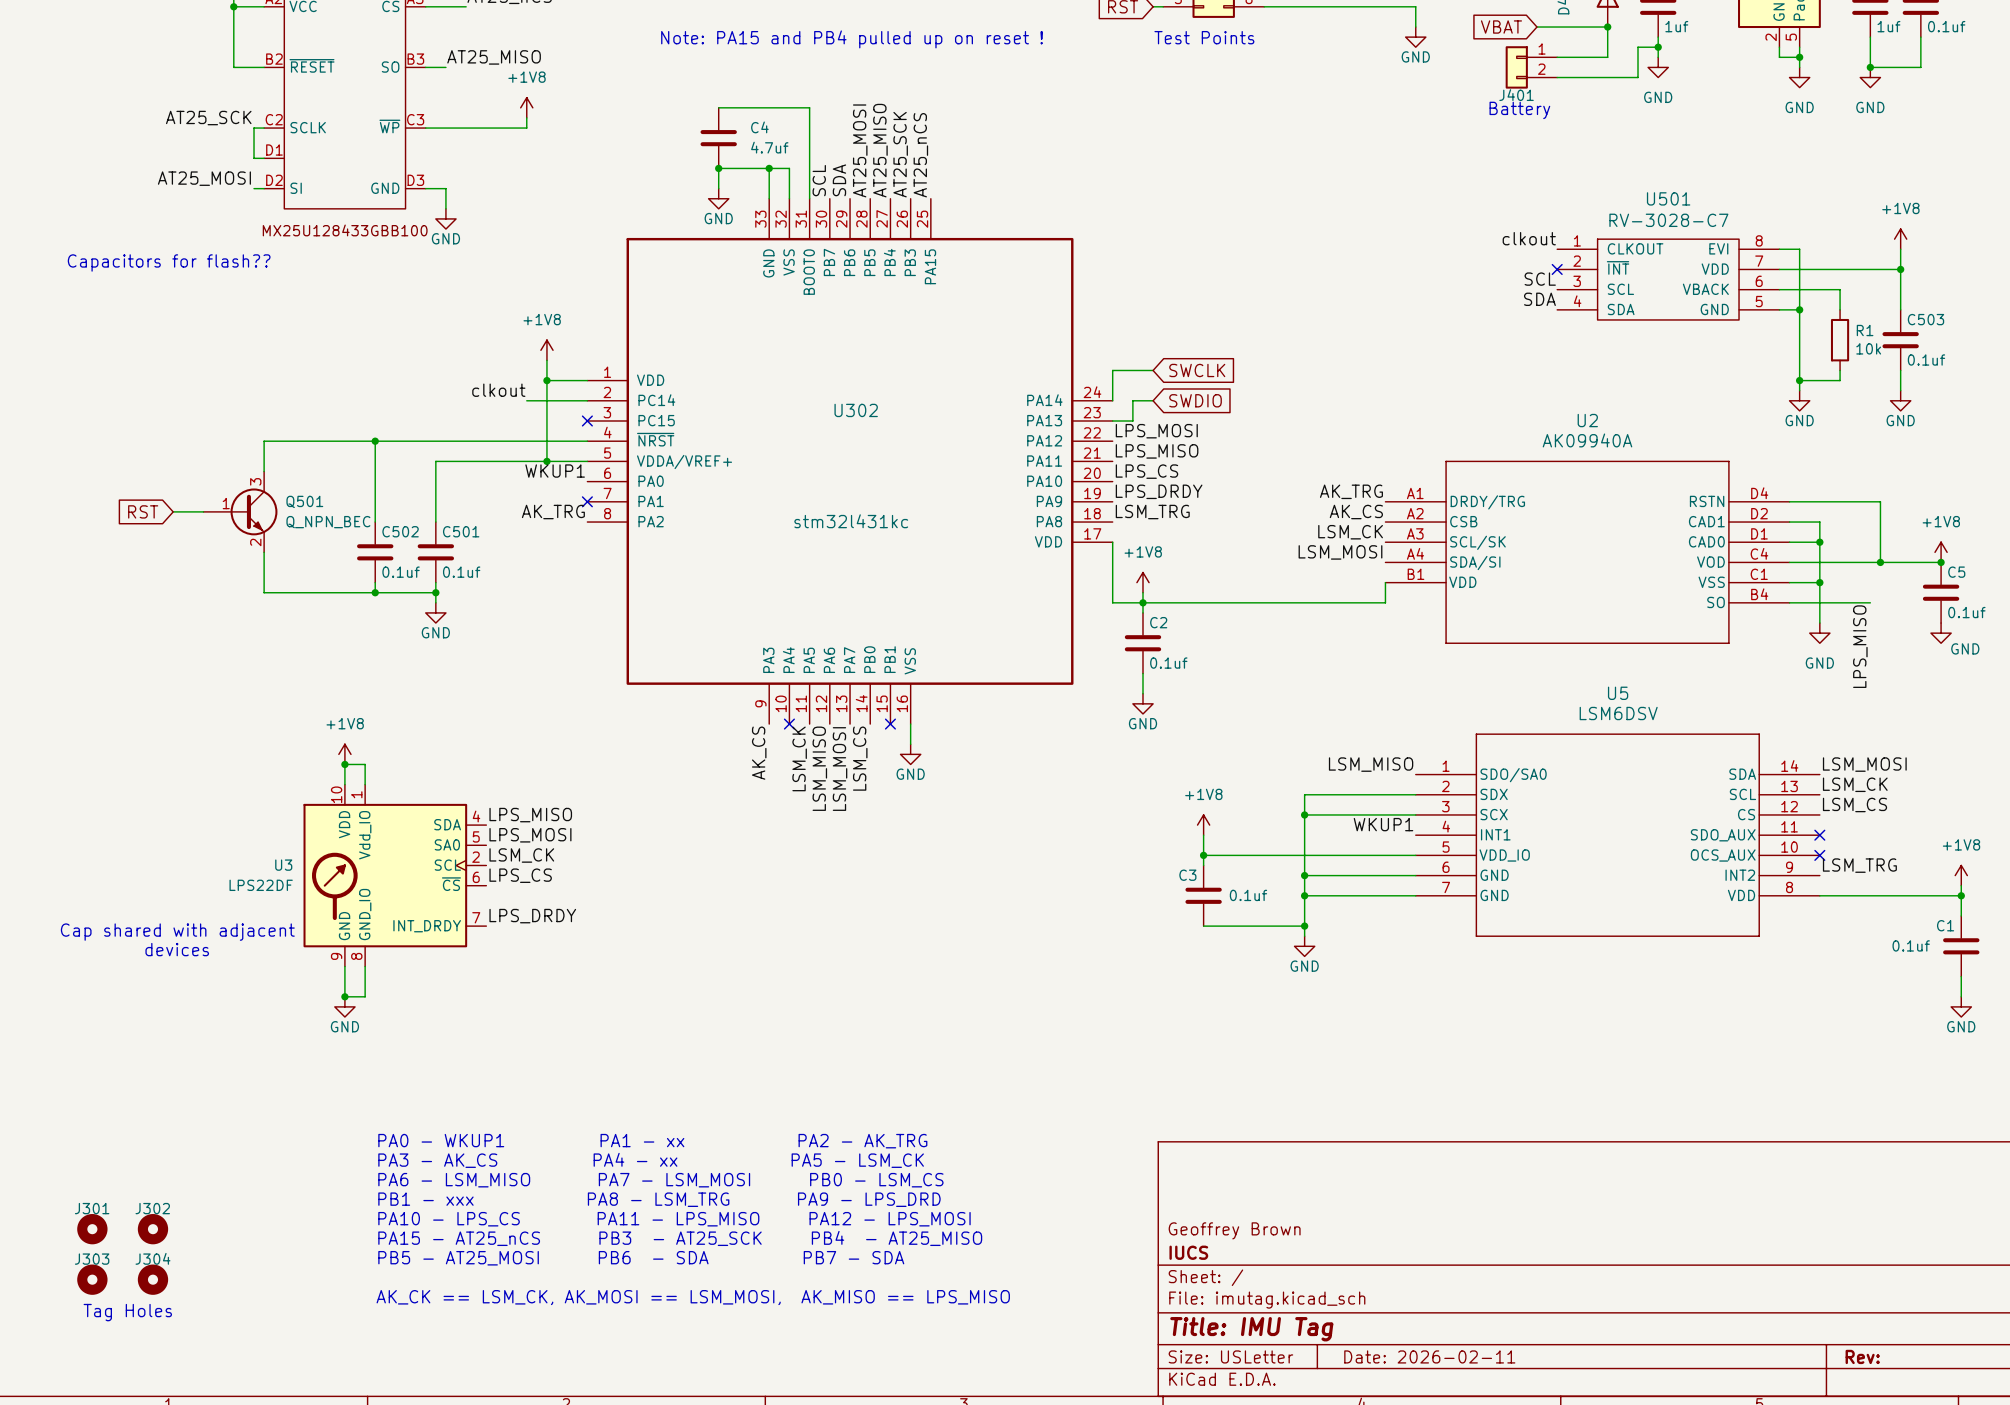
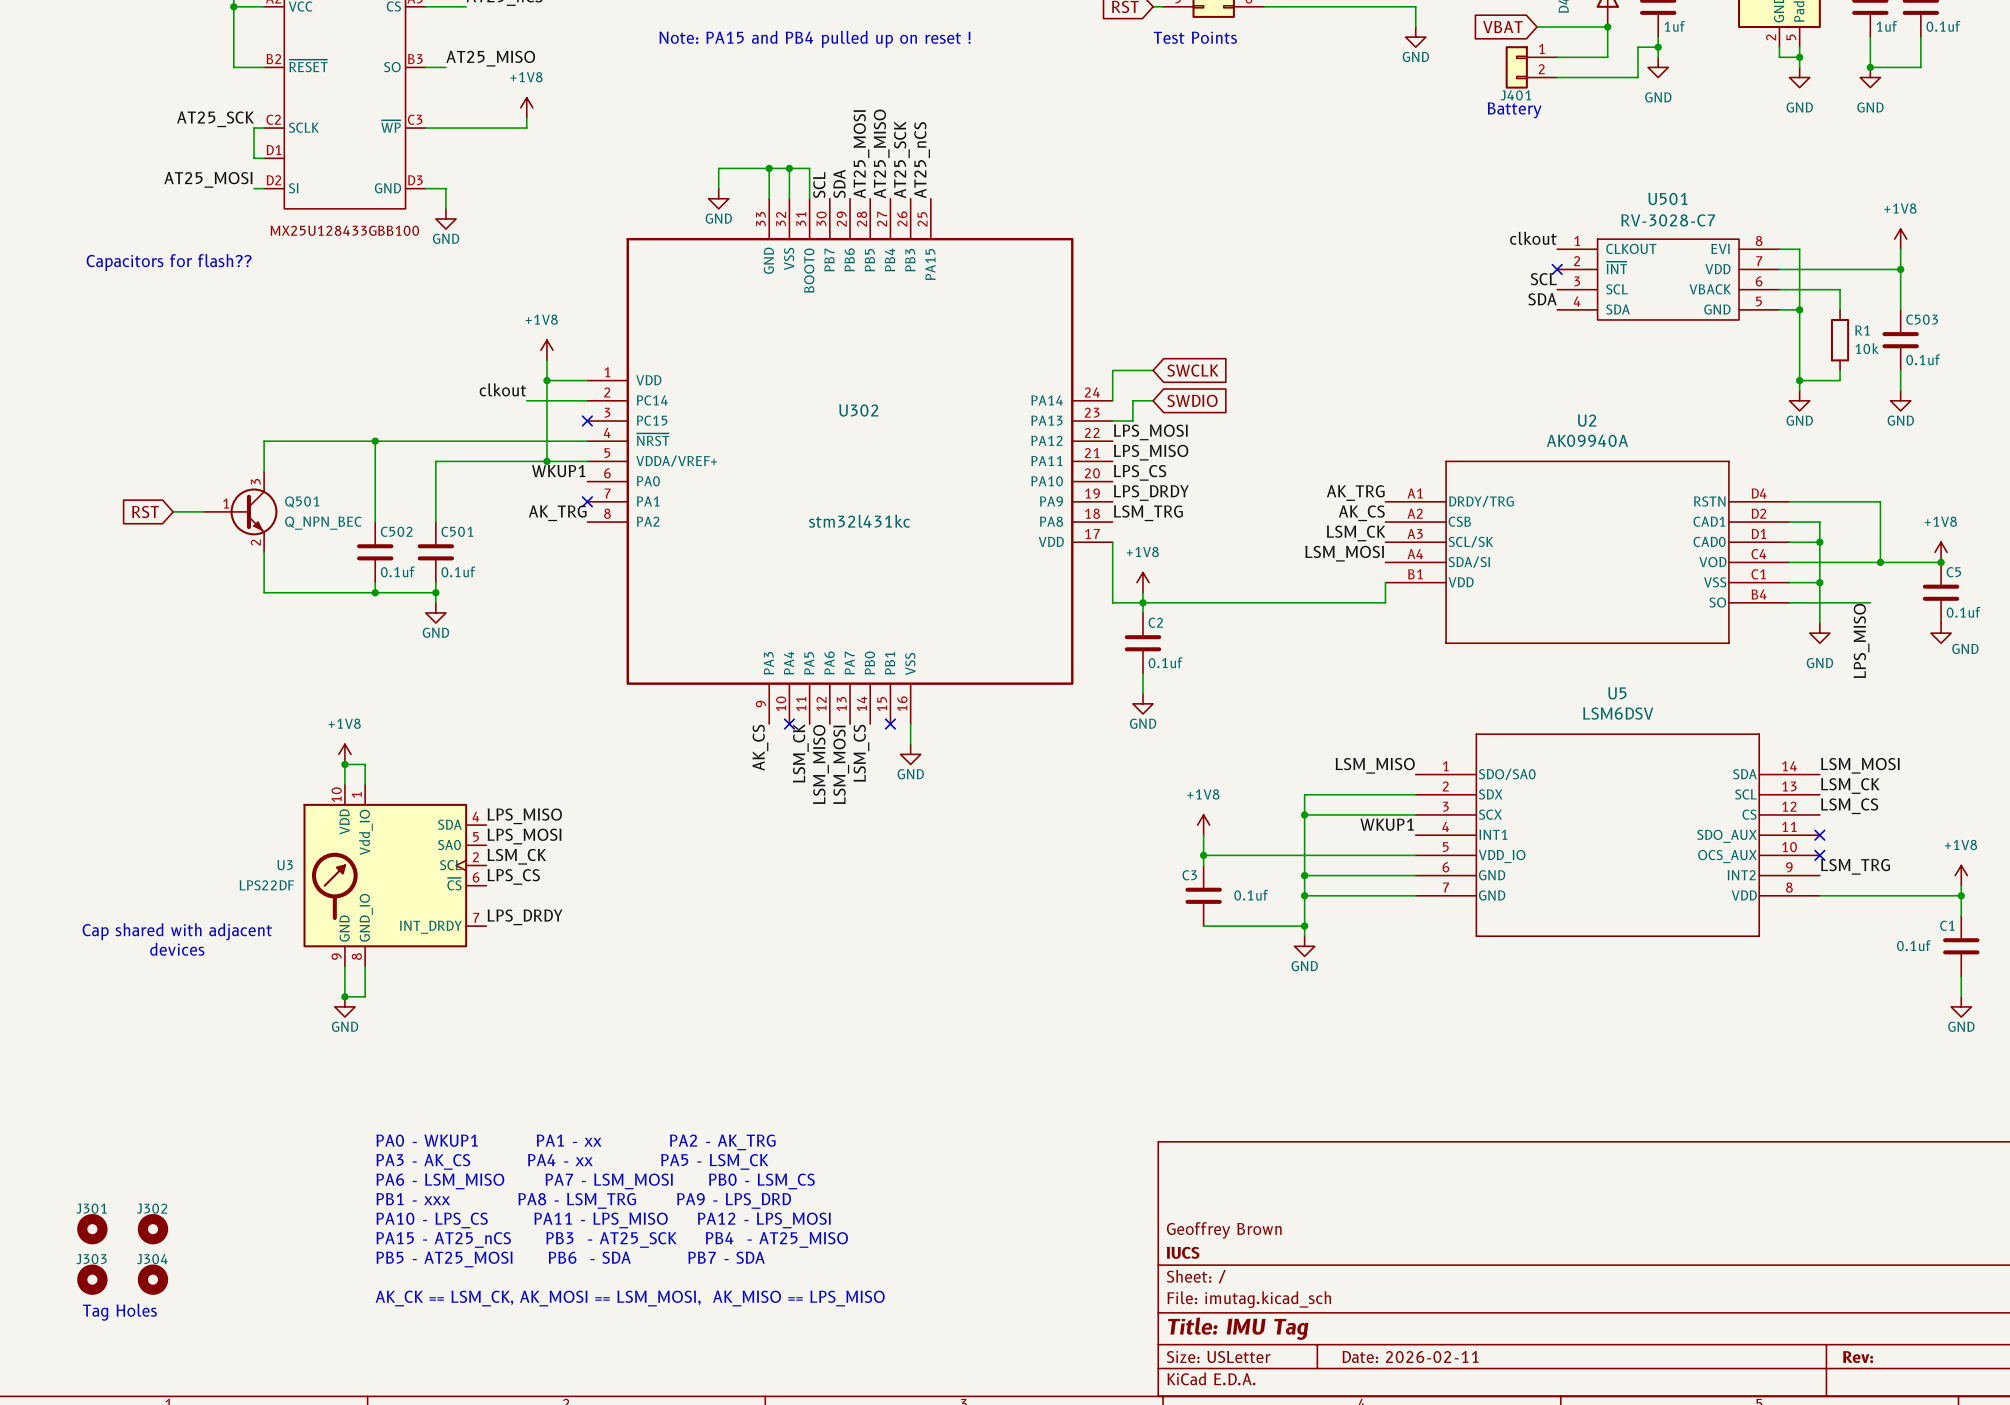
wire: (718, 107) (809, 107) (809, 168) -> (789, 168) (809, 168)
C4: 4.7uf (718, 138) -> none
junction: (718, 168) -> none
junction: none -> (789, 168)

